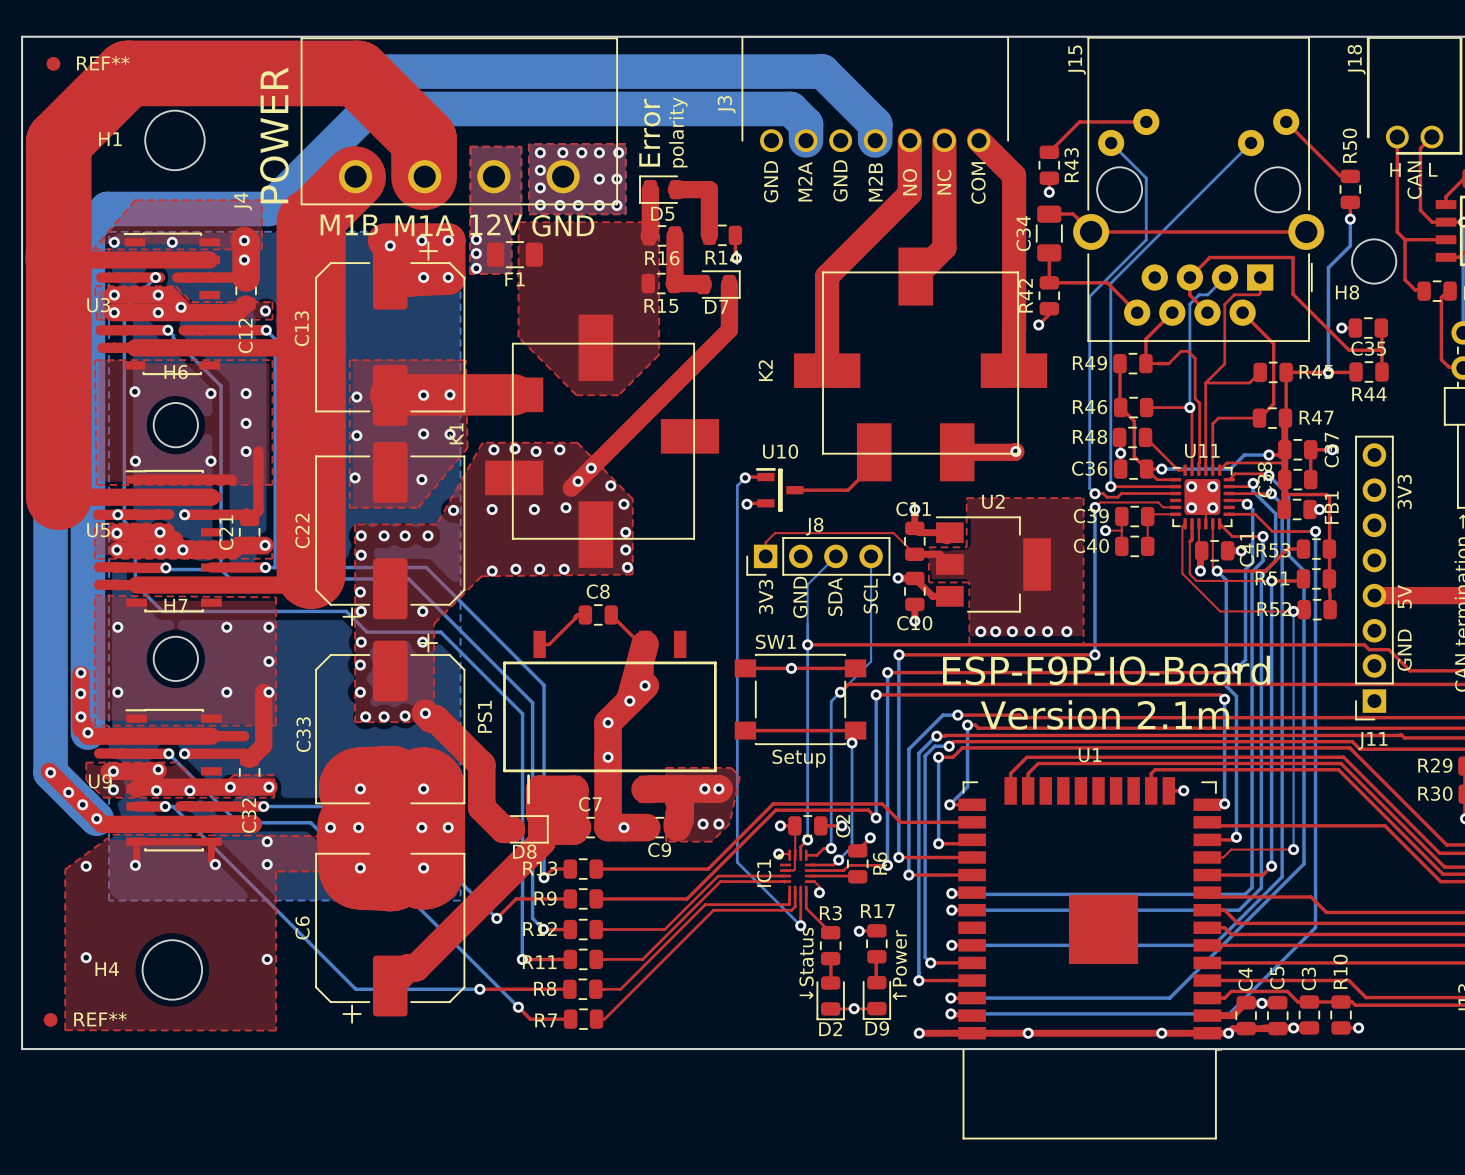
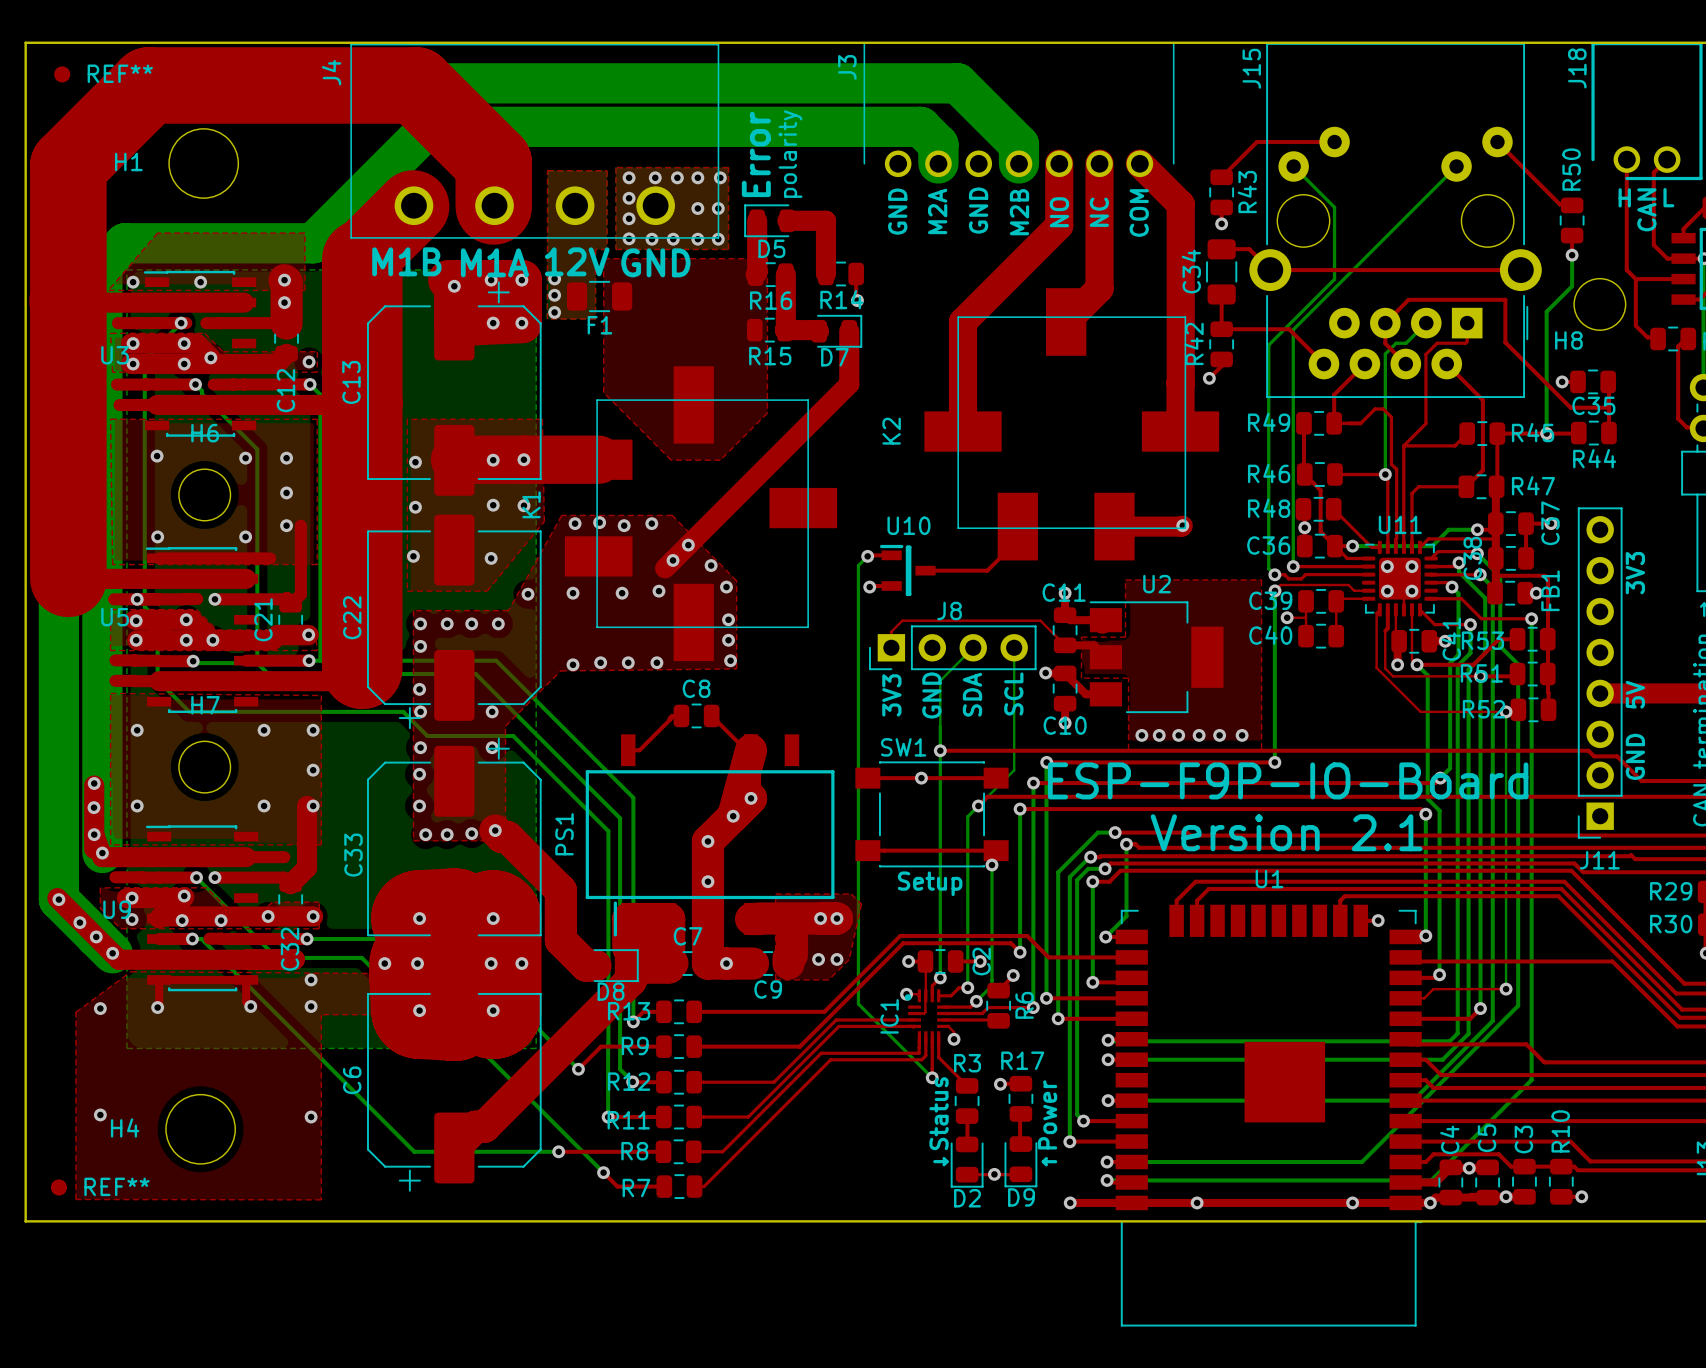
J3 name position: J3 (726, 104) -> J3 (847, 67)
text: POWER (274, 135) -> none
J4 name position: J4 (243, 201) -> J4 (331, 72)
text: Version 2.1m (1104, 714) -> Version 2.1 (1286, 832)

